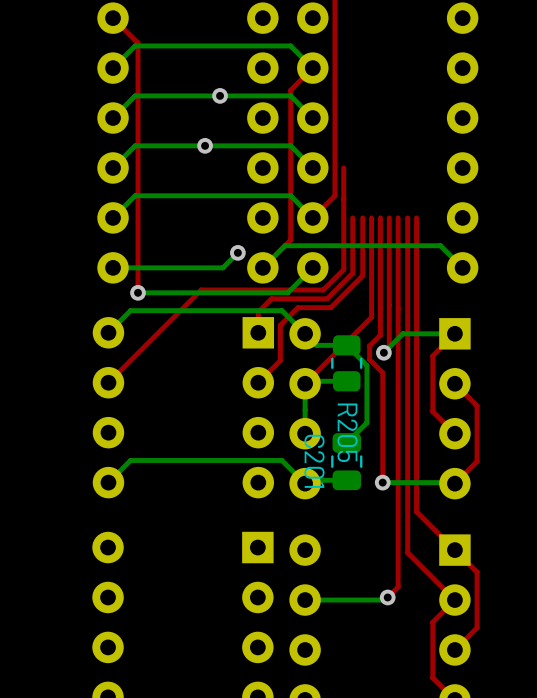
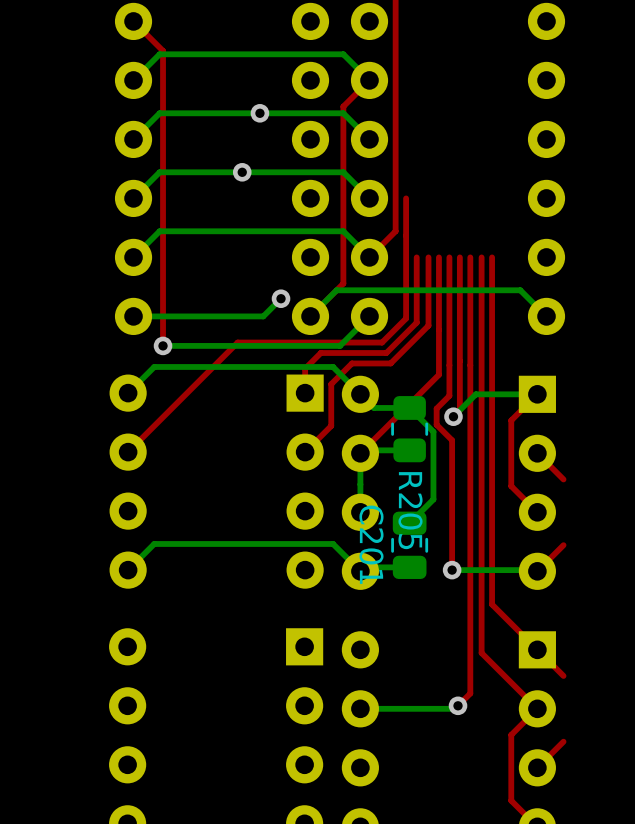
top track: (477, 405) (477, 461) -> none
top track: (477, 572) (477, 627) -> none

